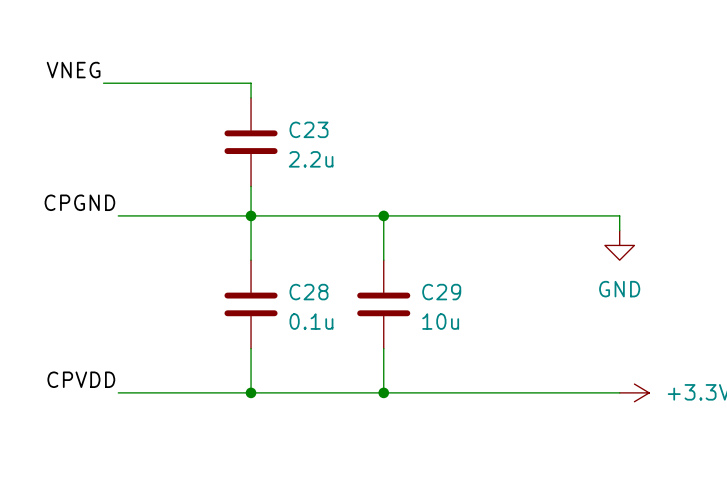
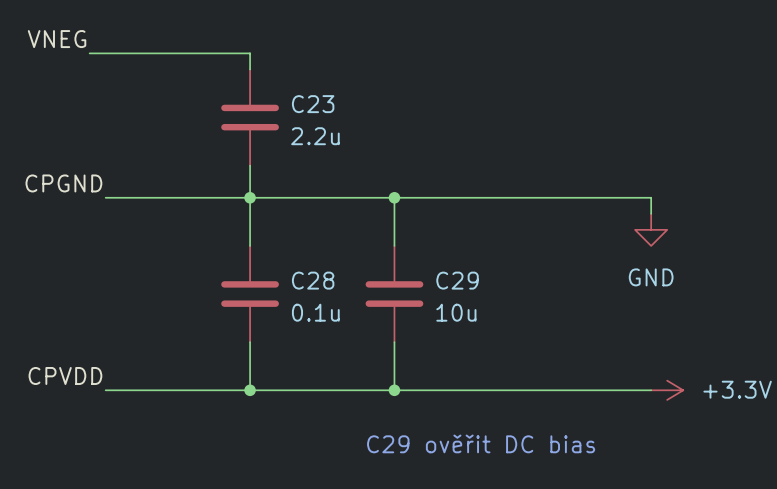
text: none -> C29 ověřit DC bias (481, 443)

